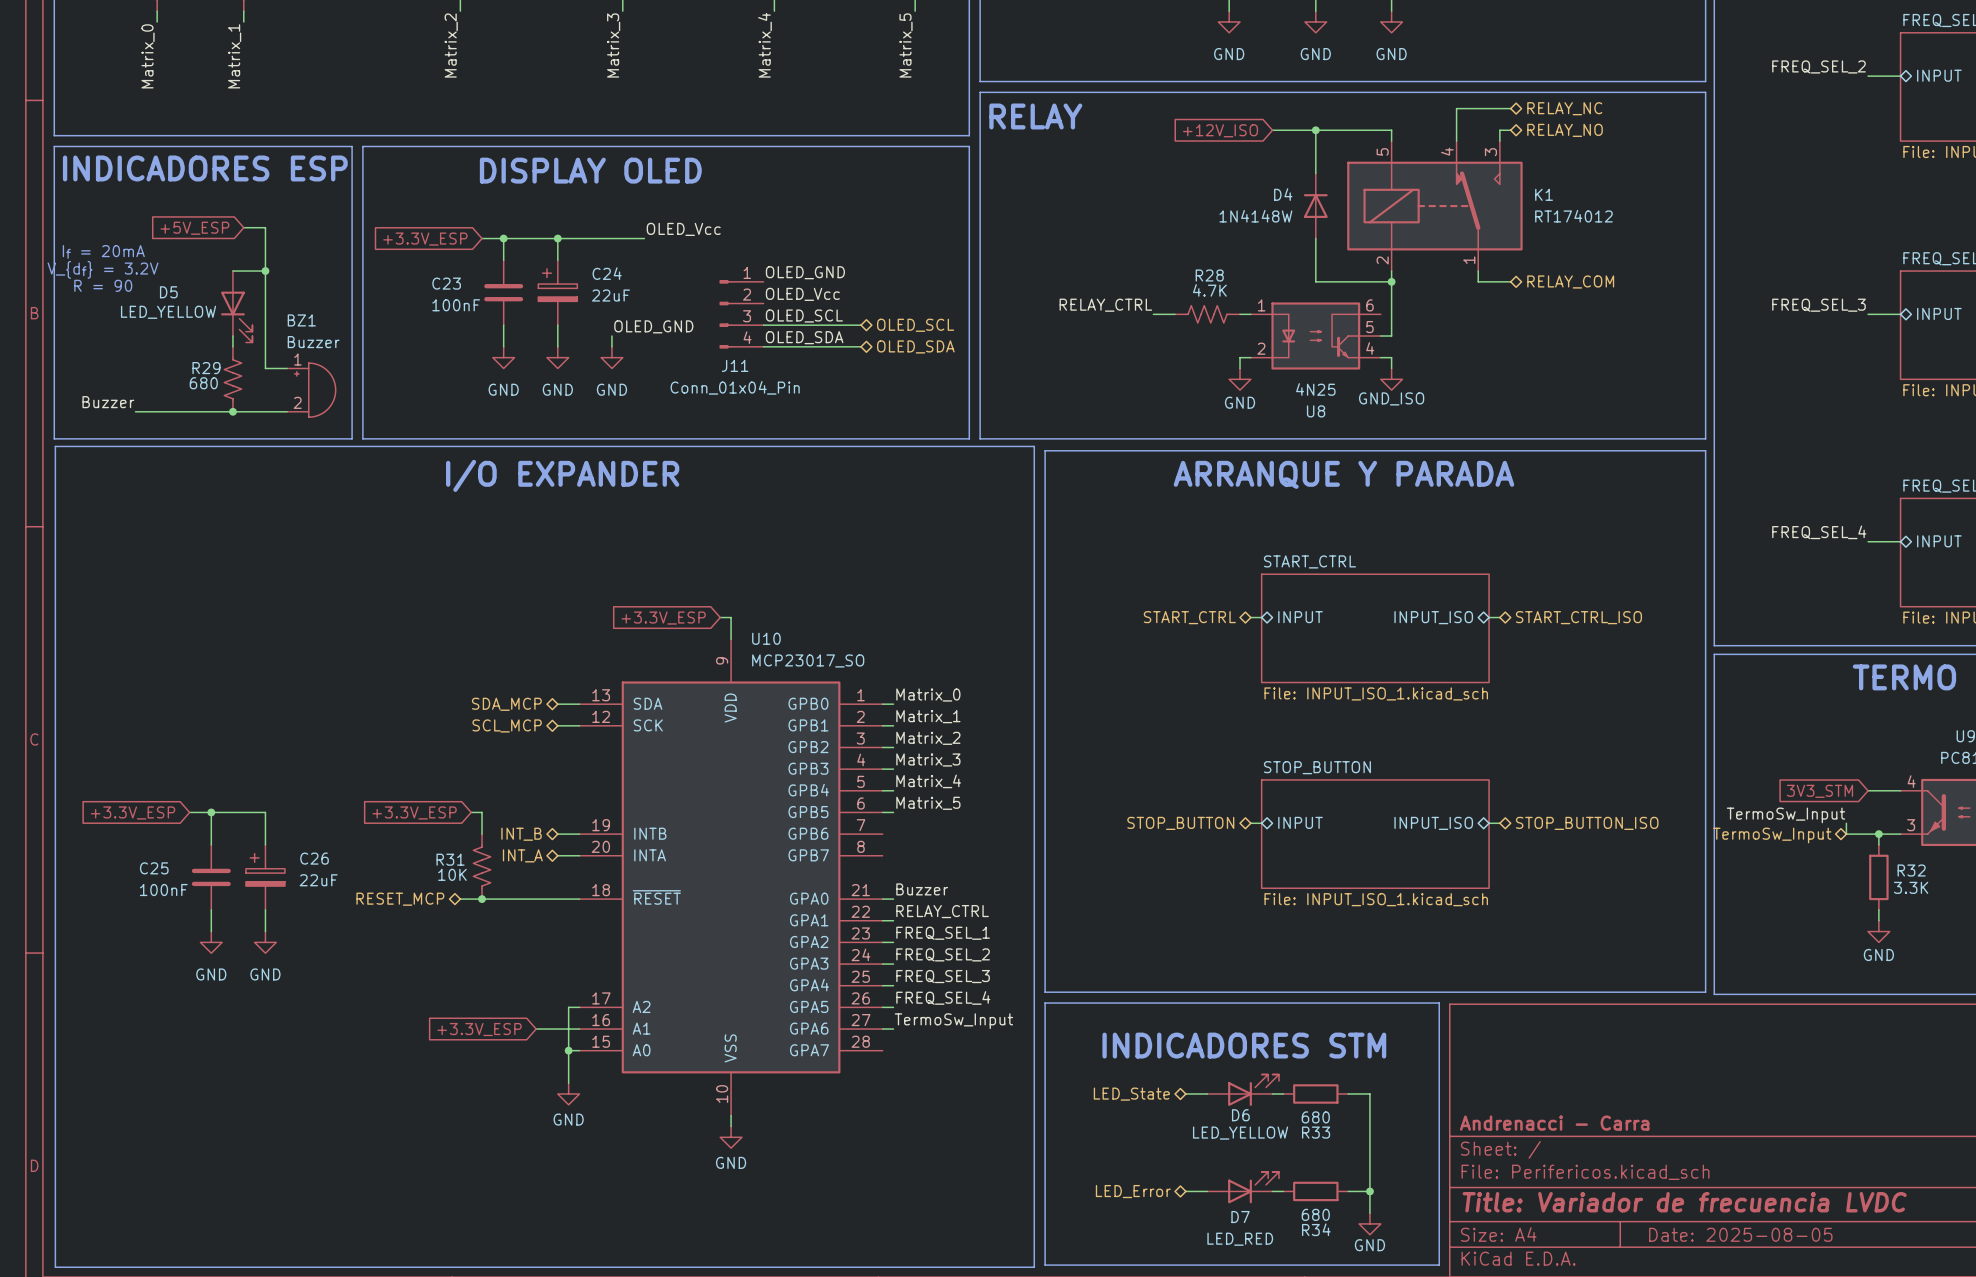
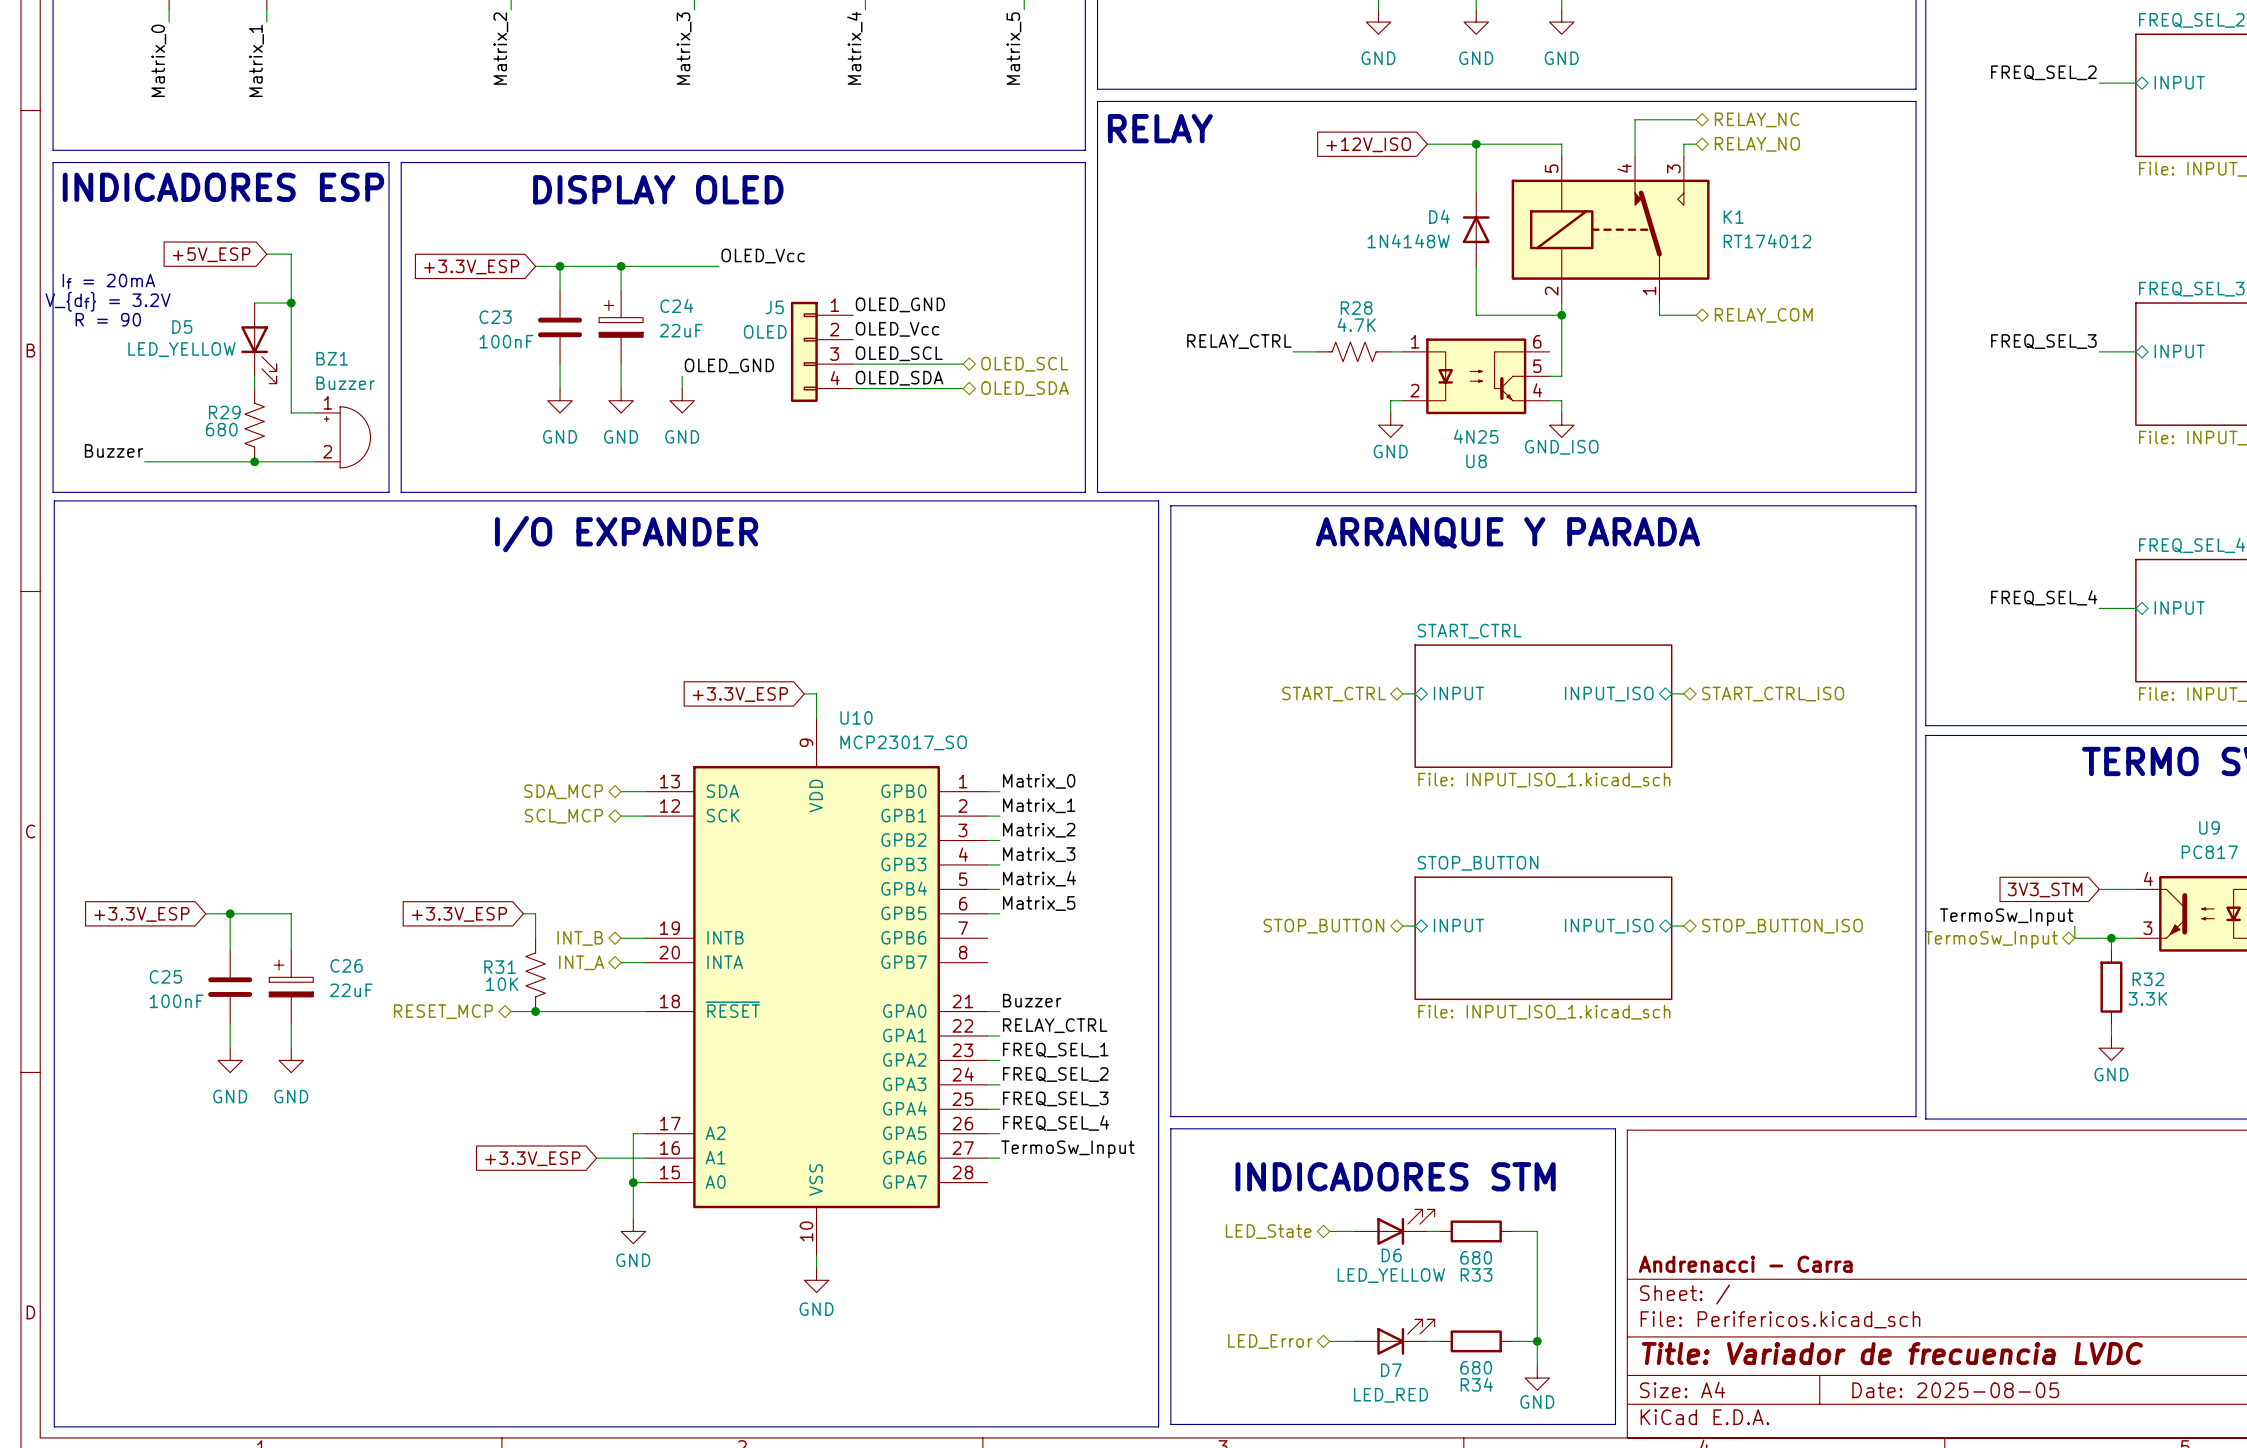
J5: none -> OLED (822, 351)
J11: Conn_01x04_Pin (741, 314) -> none

